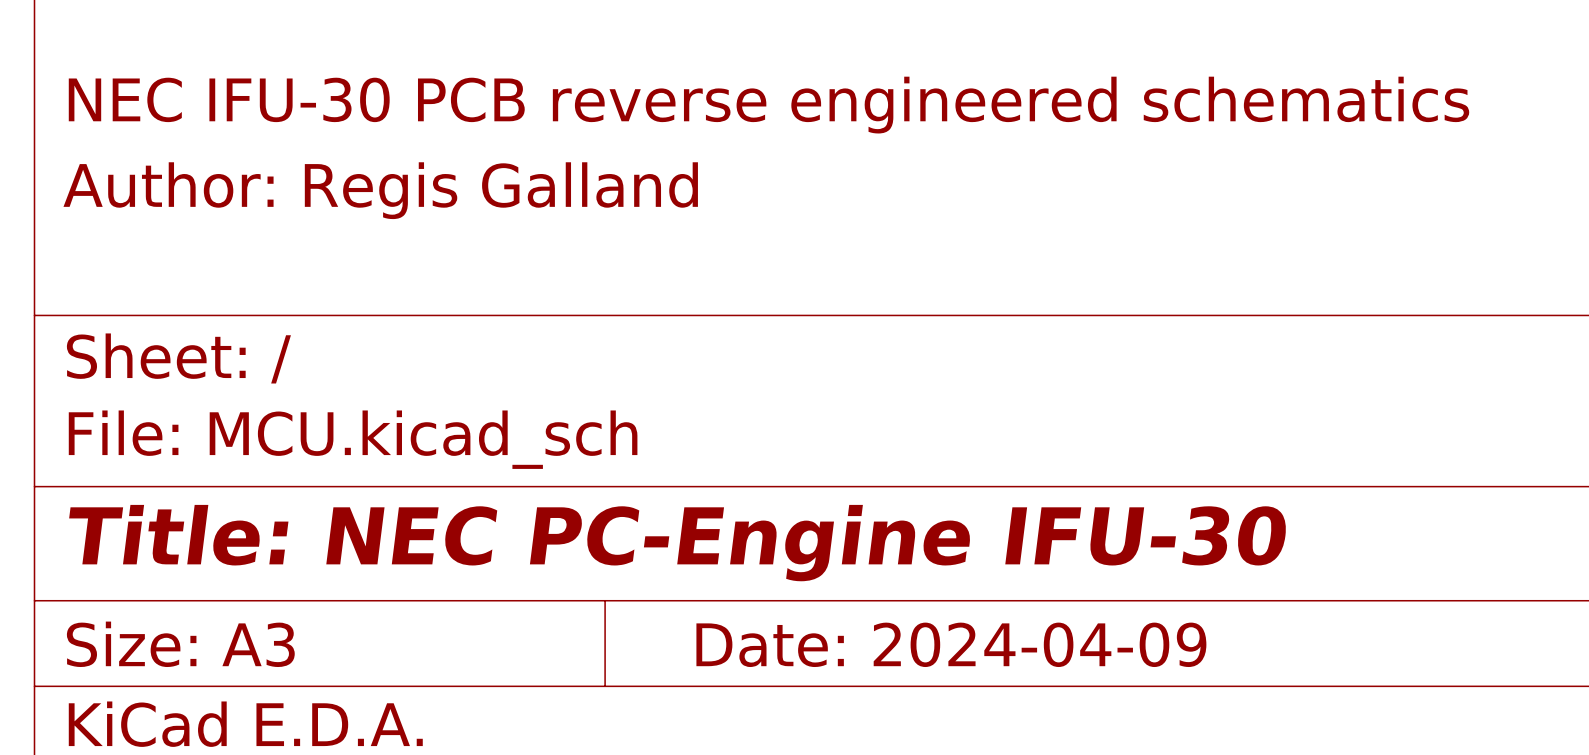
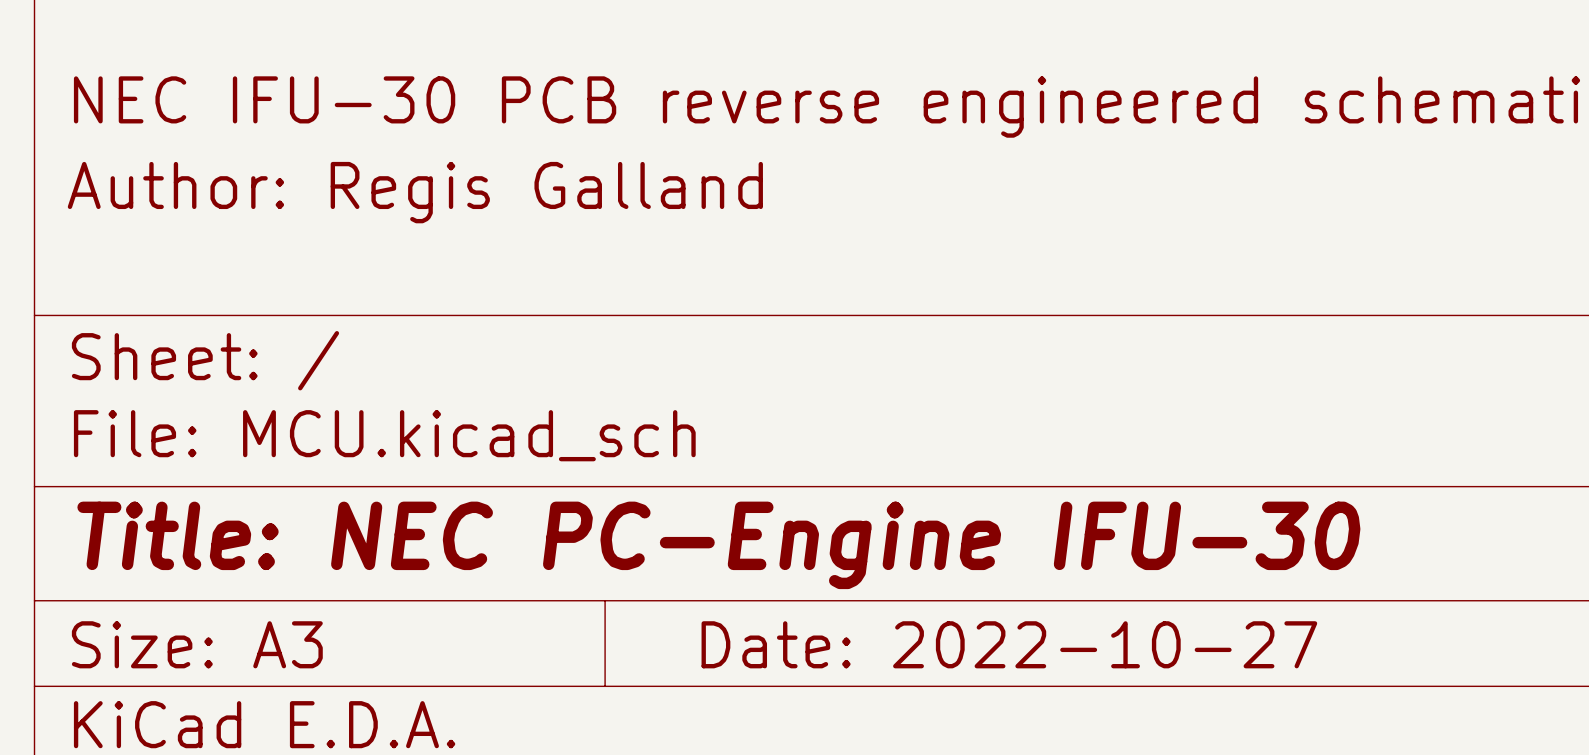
title block: Date: 2024-04-09 (951, 644) -> Date: 2022-10-27 (1009, 644)

